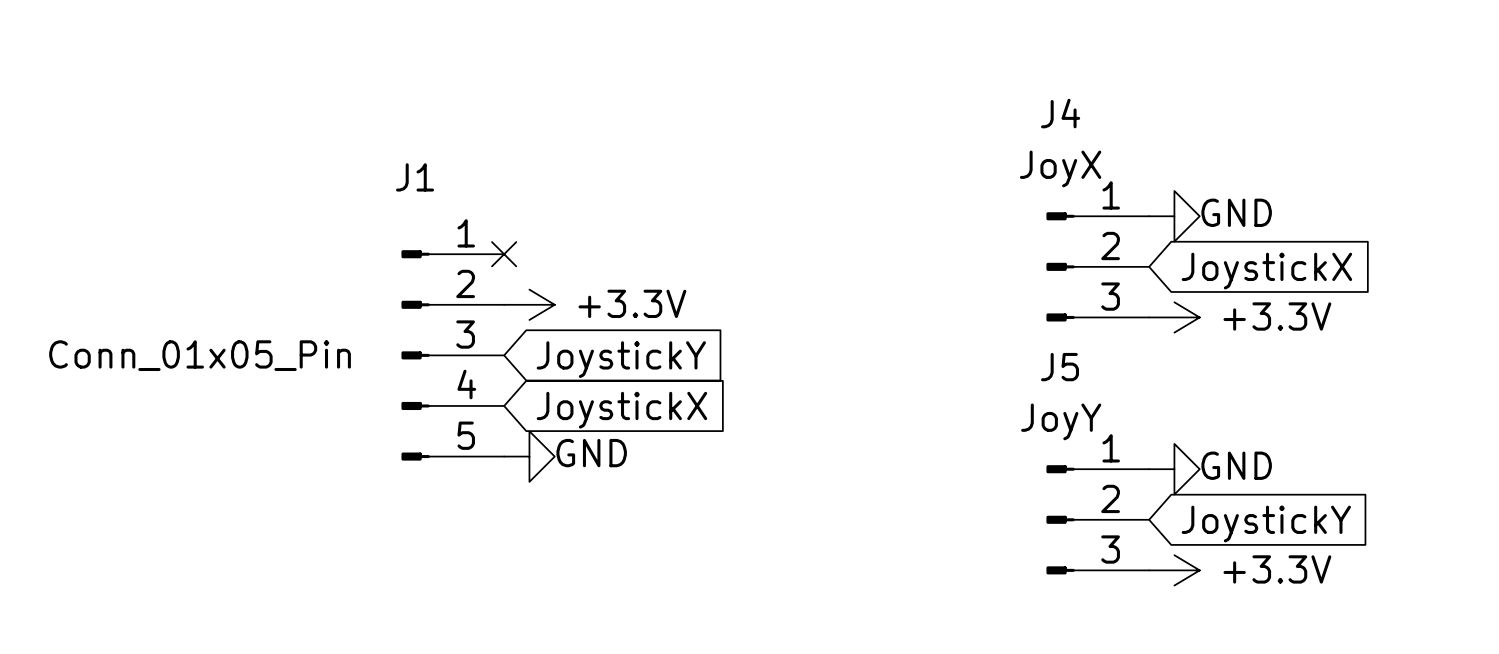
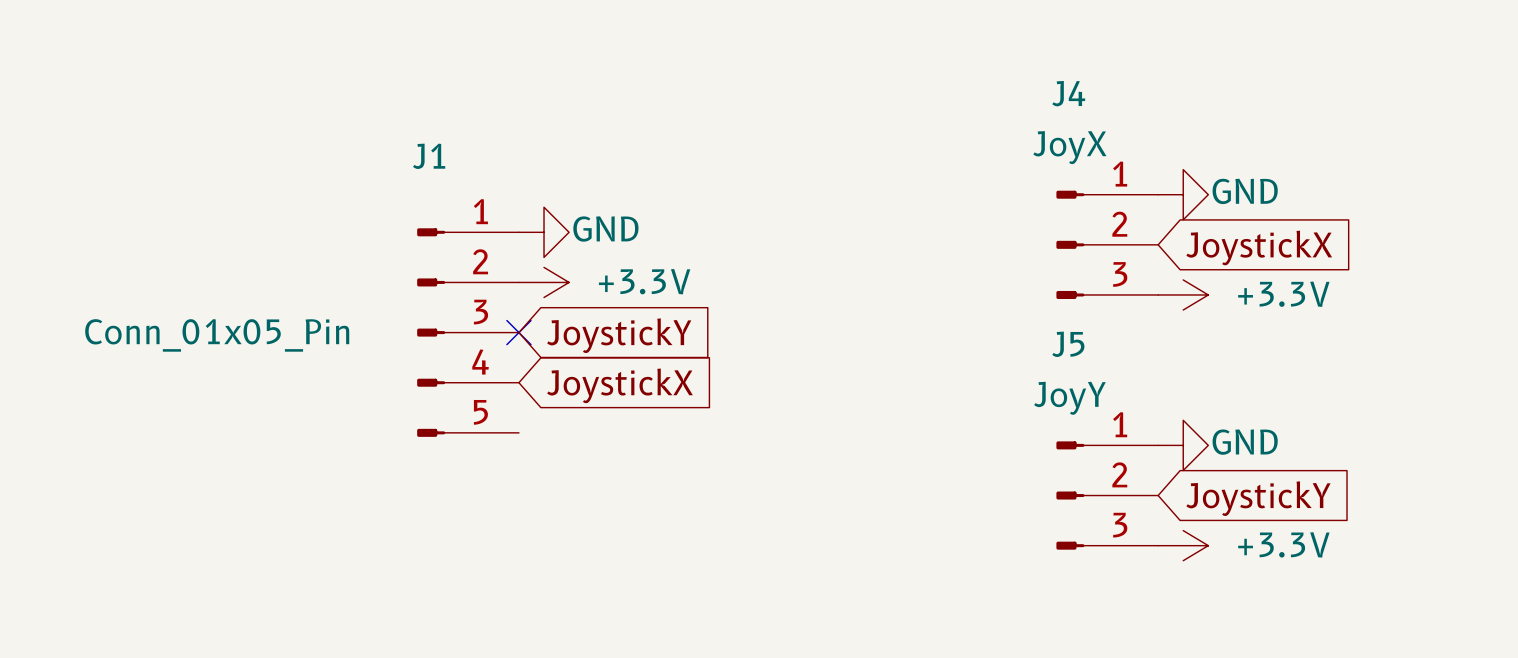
no-connect mark position: (504, 254) -> (518, 332)
power symbol position: GND (529, 456) -> GND (544, 232)

